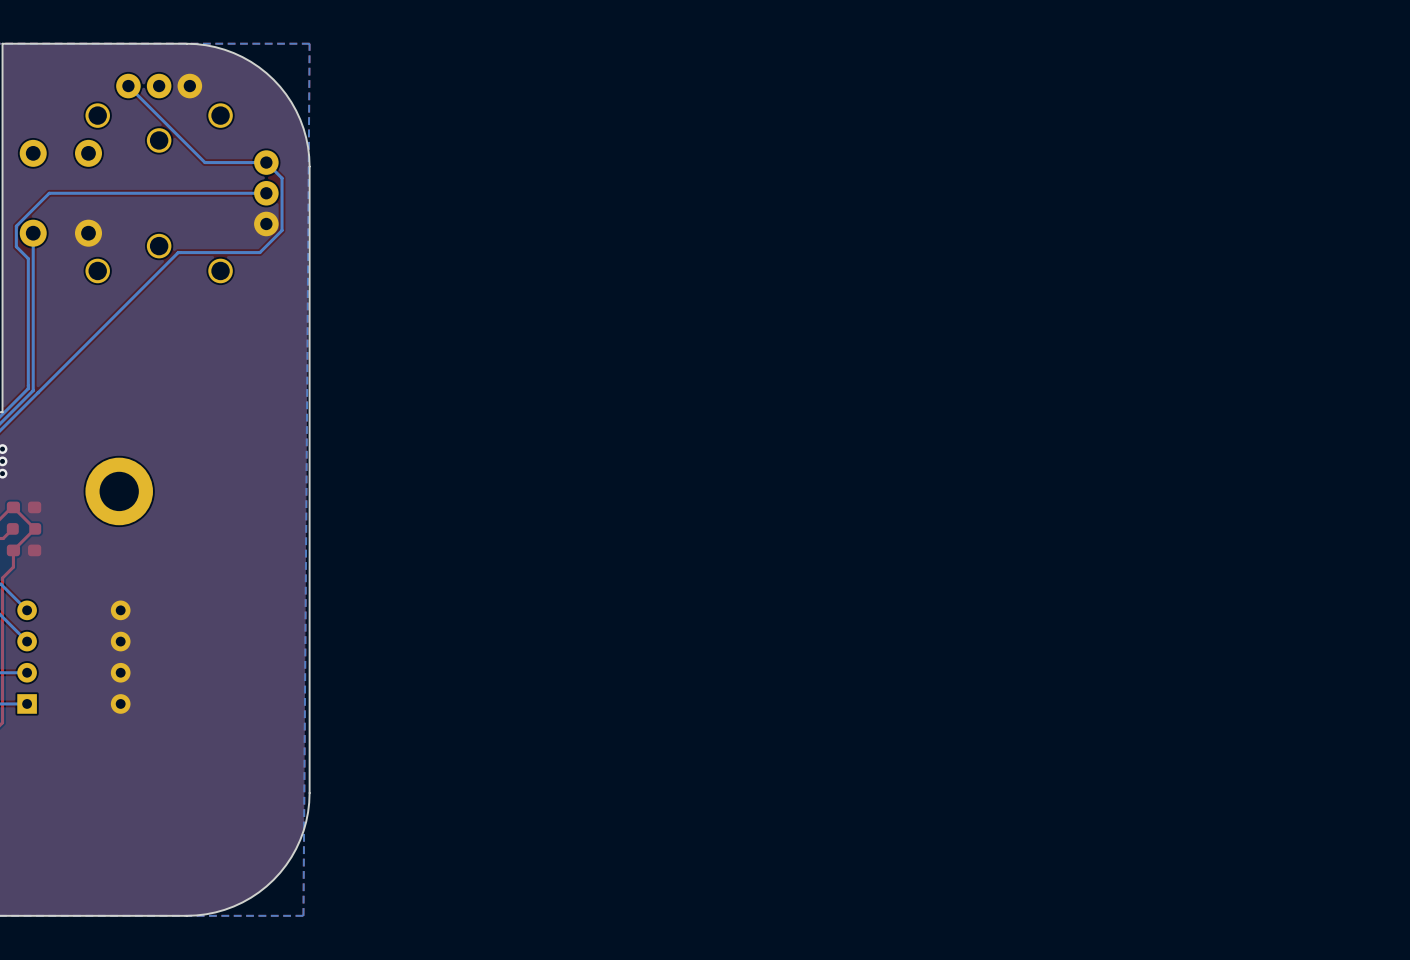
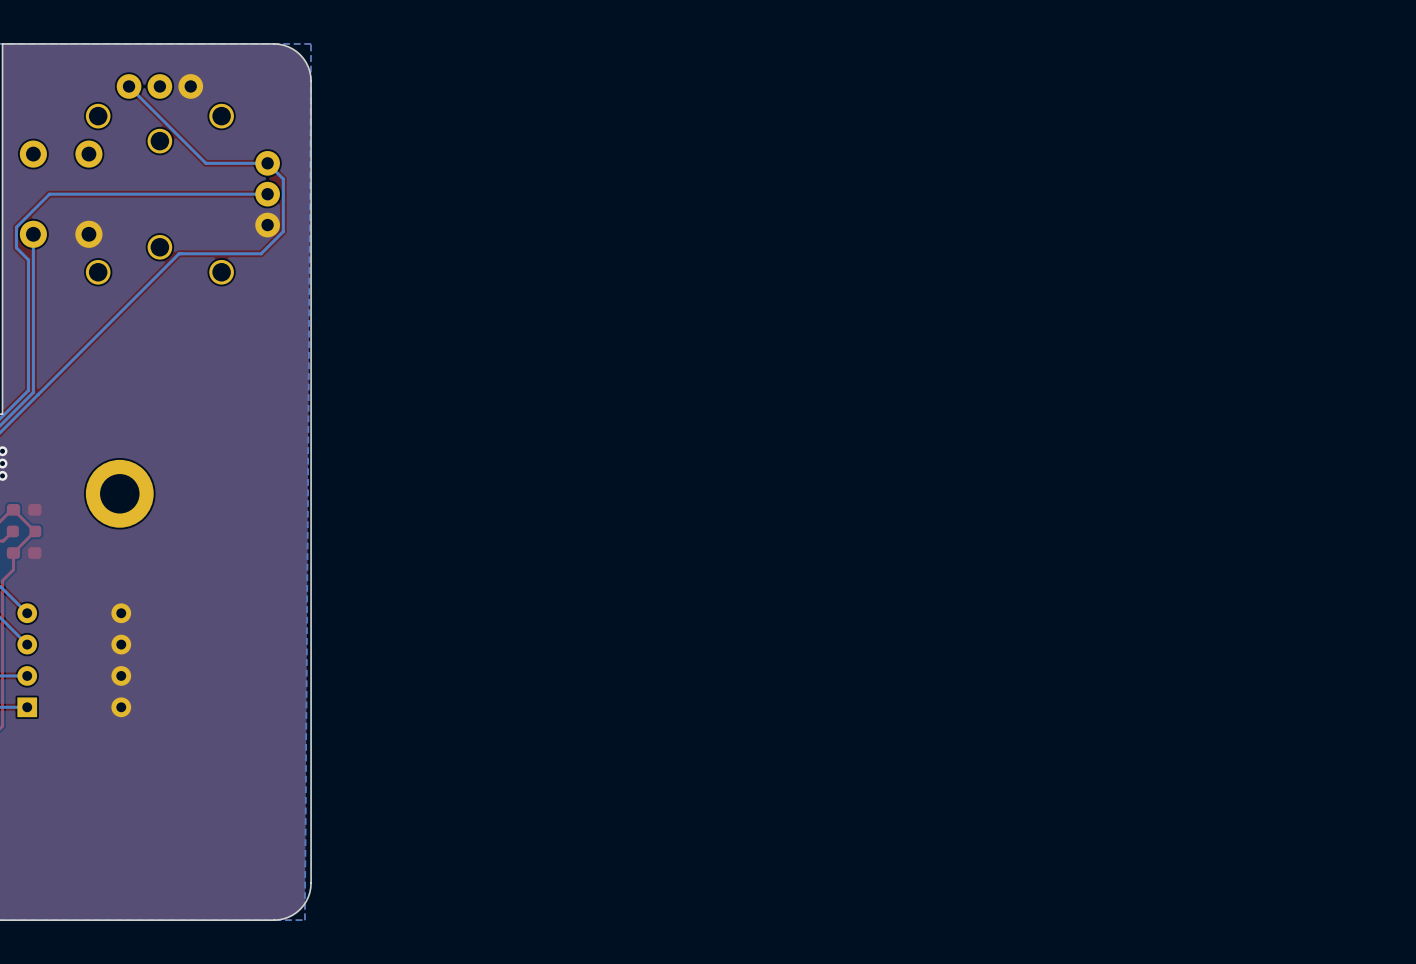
board edge: (186, 43) (215, 47) (233, 53) (258, 67) (273, 79) (291, 102) (300, 119) (308, 147) (309, 166) -> (187, 43) (278, 44) (288, 46) (300, 54) (306, 62) (310, 76) (311, 167)
board edge: (309, 793) (306, 821) (300, 840) (286, 865) (273, 879) (258, 892) (233, 906) (205, 914) (186, 915) -> (311, 796) (310, 887) (308, 897) (300, 909) (288, 917) (278, 919) (187, 920)

